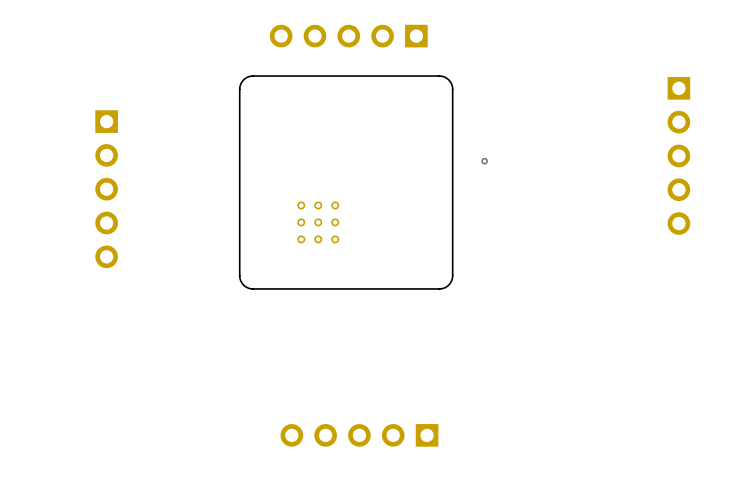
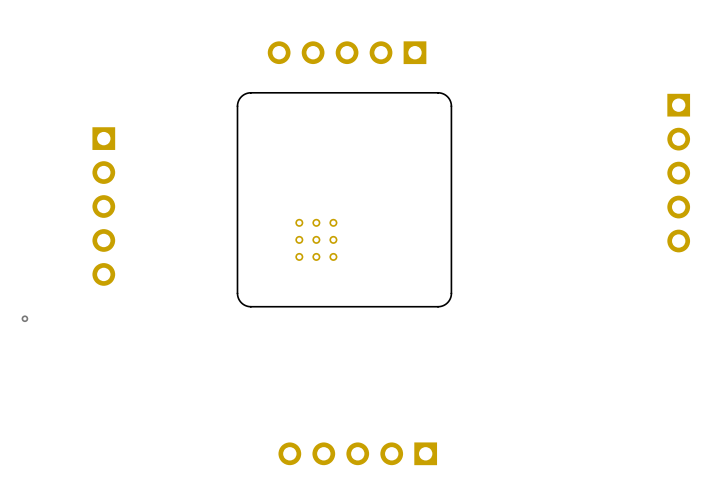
via: (484, 161) -> none
via: none -> (24, 318)

